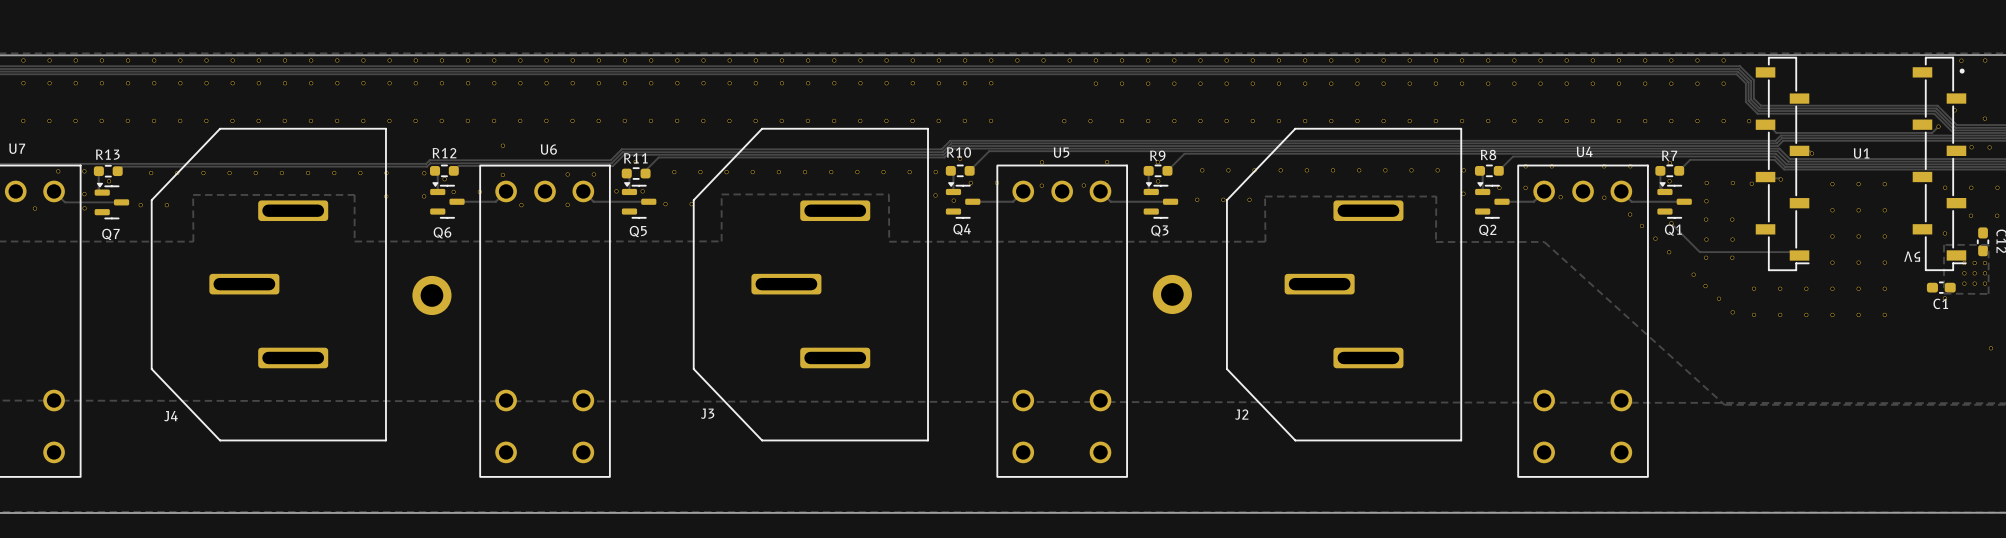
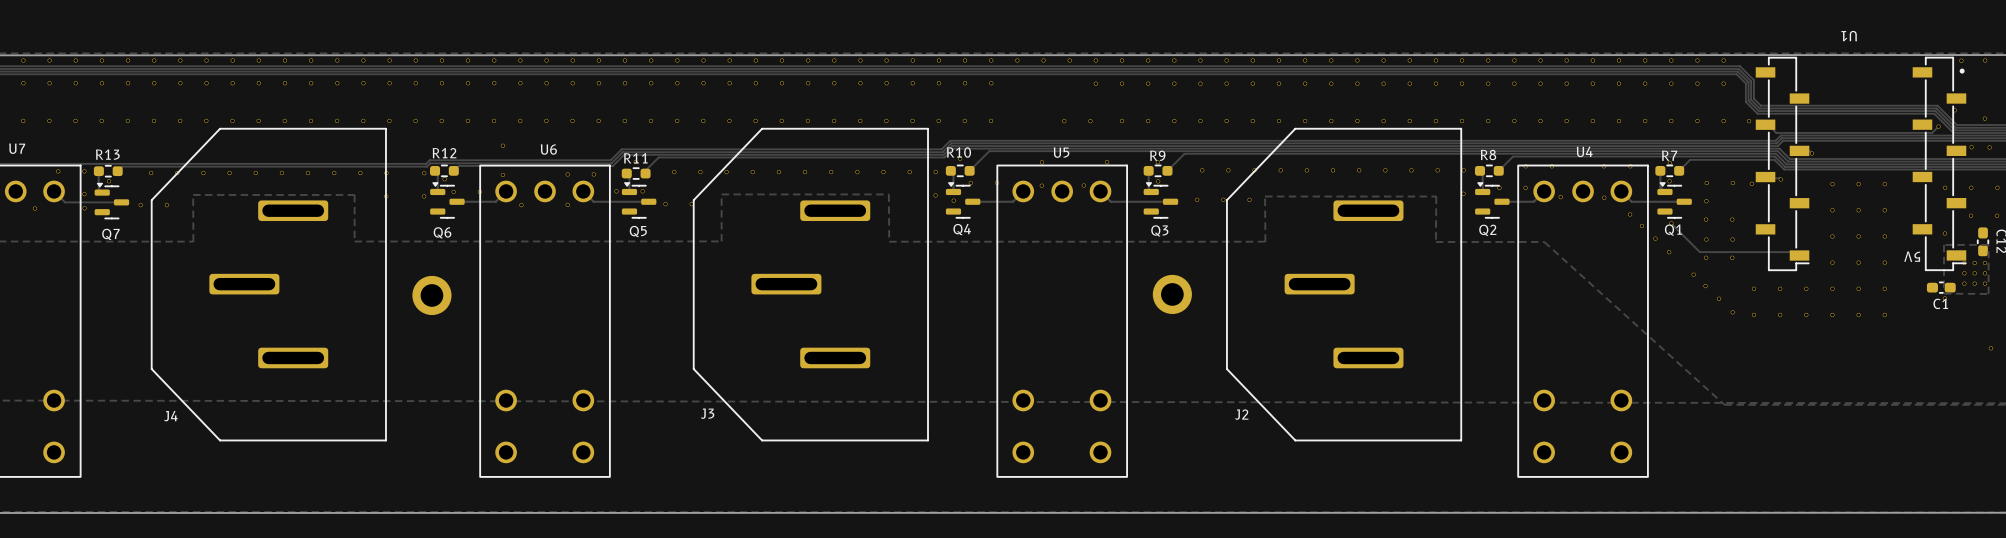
U1 name rotation: 0° (1861, 153) -> 180° (1849, 36)
U1 name position: U1 (1861, 153) -> U1 (1849, 36)

